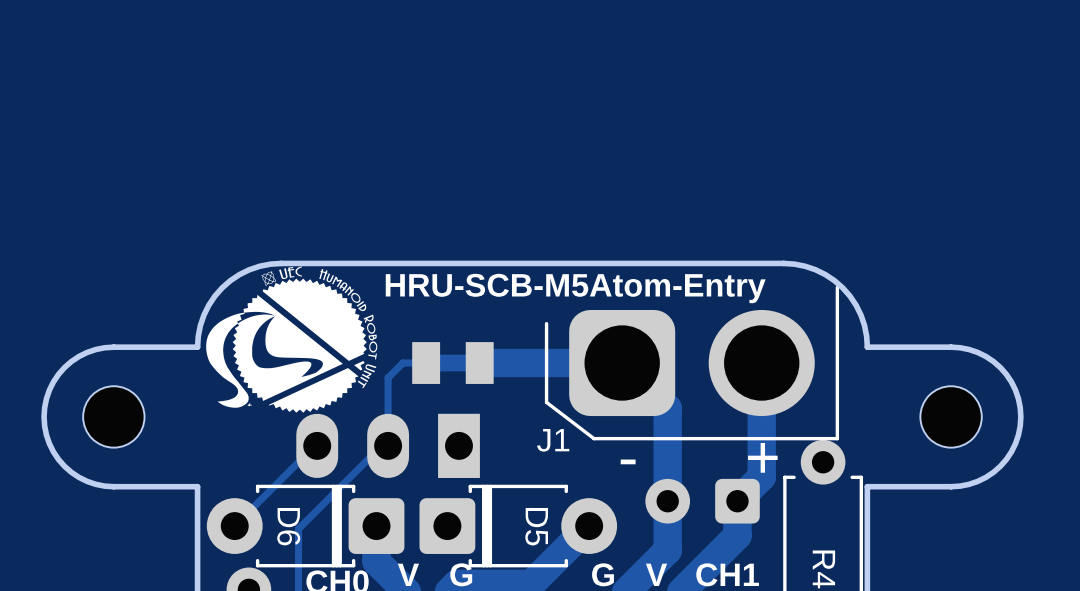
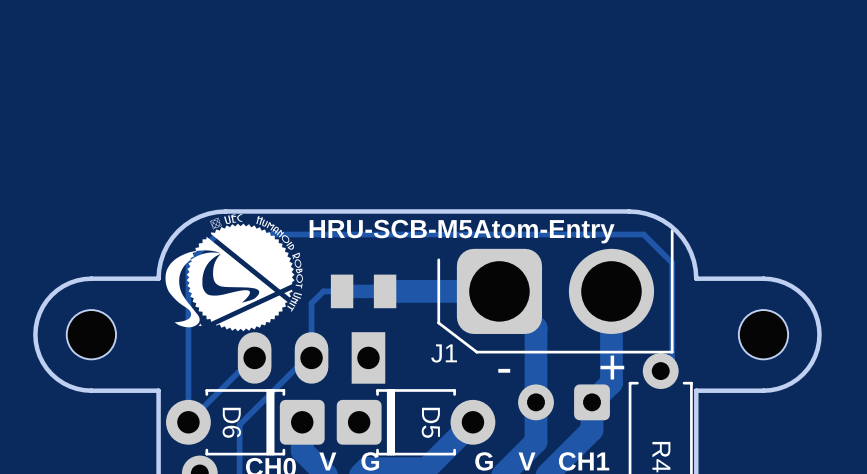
track: none -> (660, 371) (672, 359) (672, 262) (643, 234) (216, 234) (188, 262) (188, 422)

